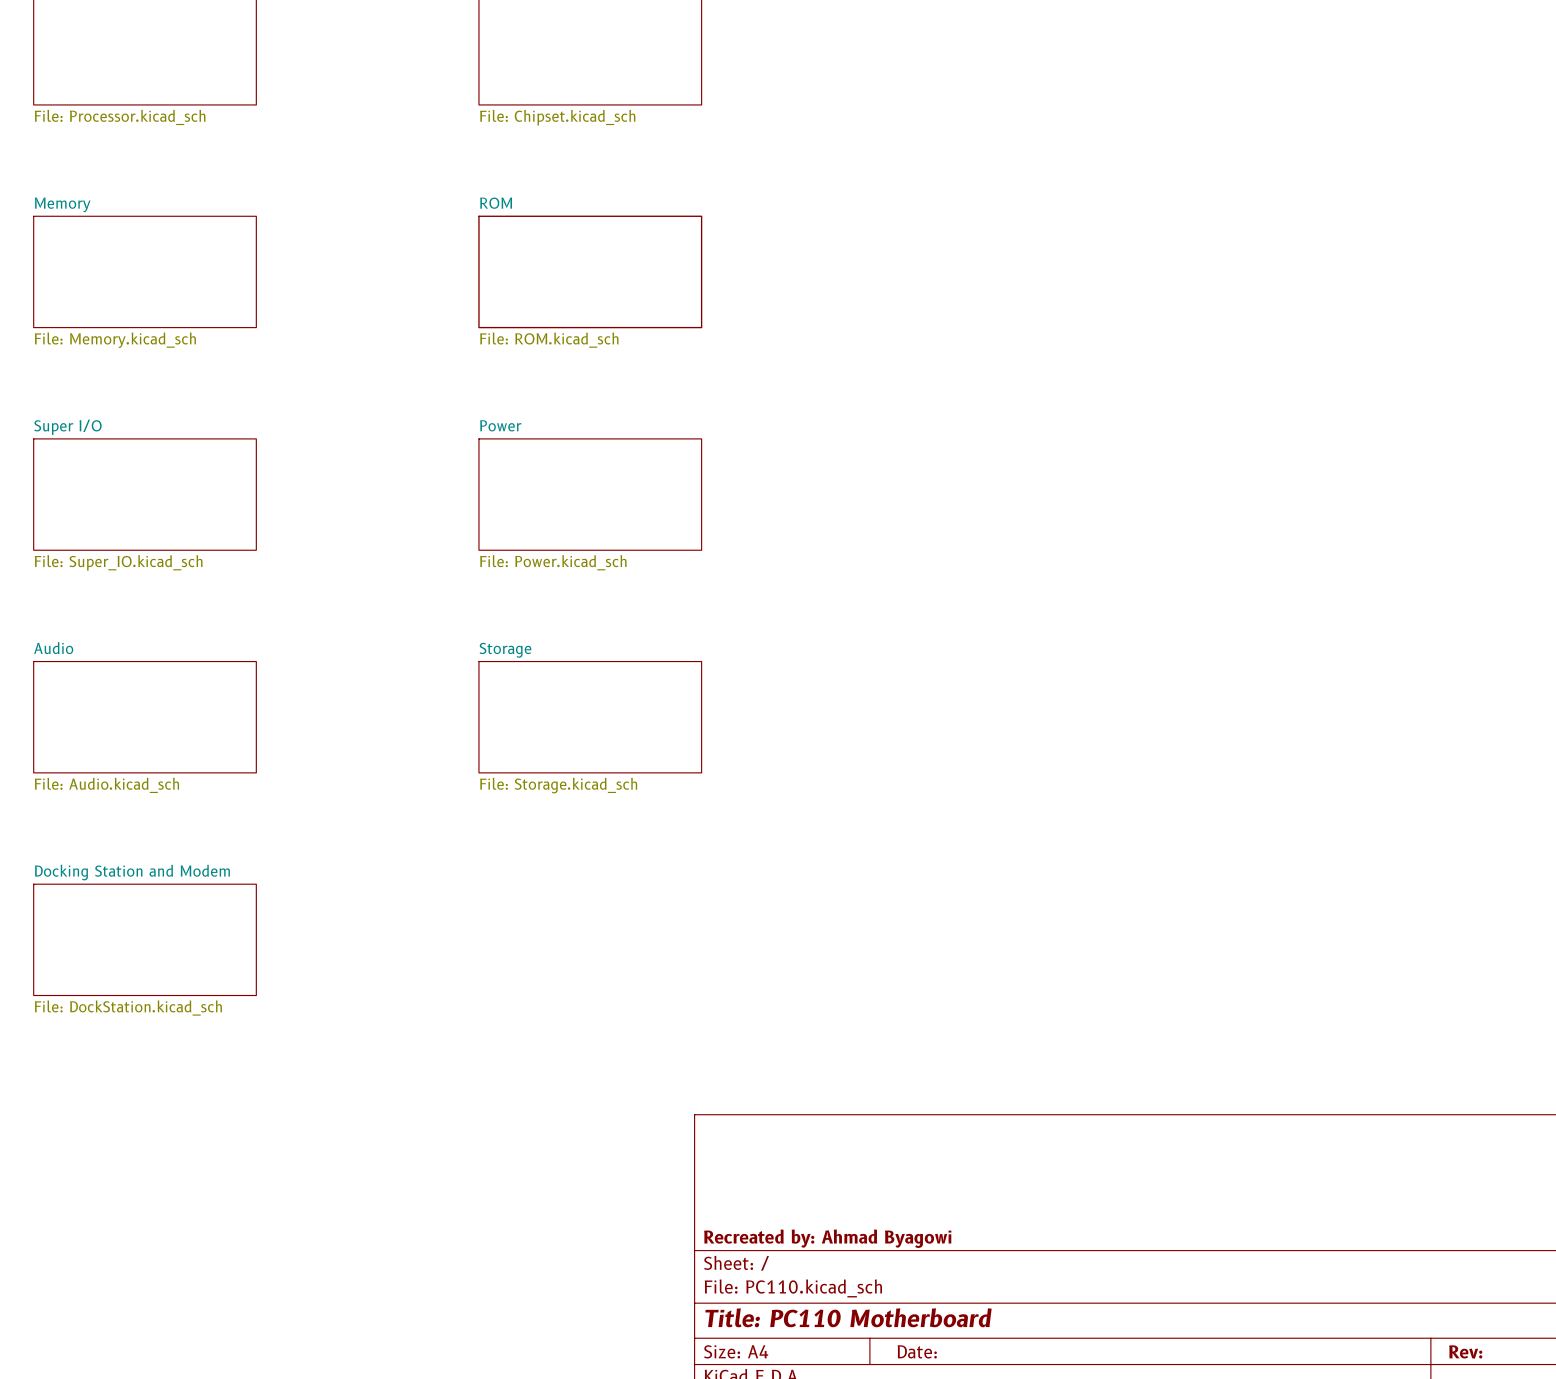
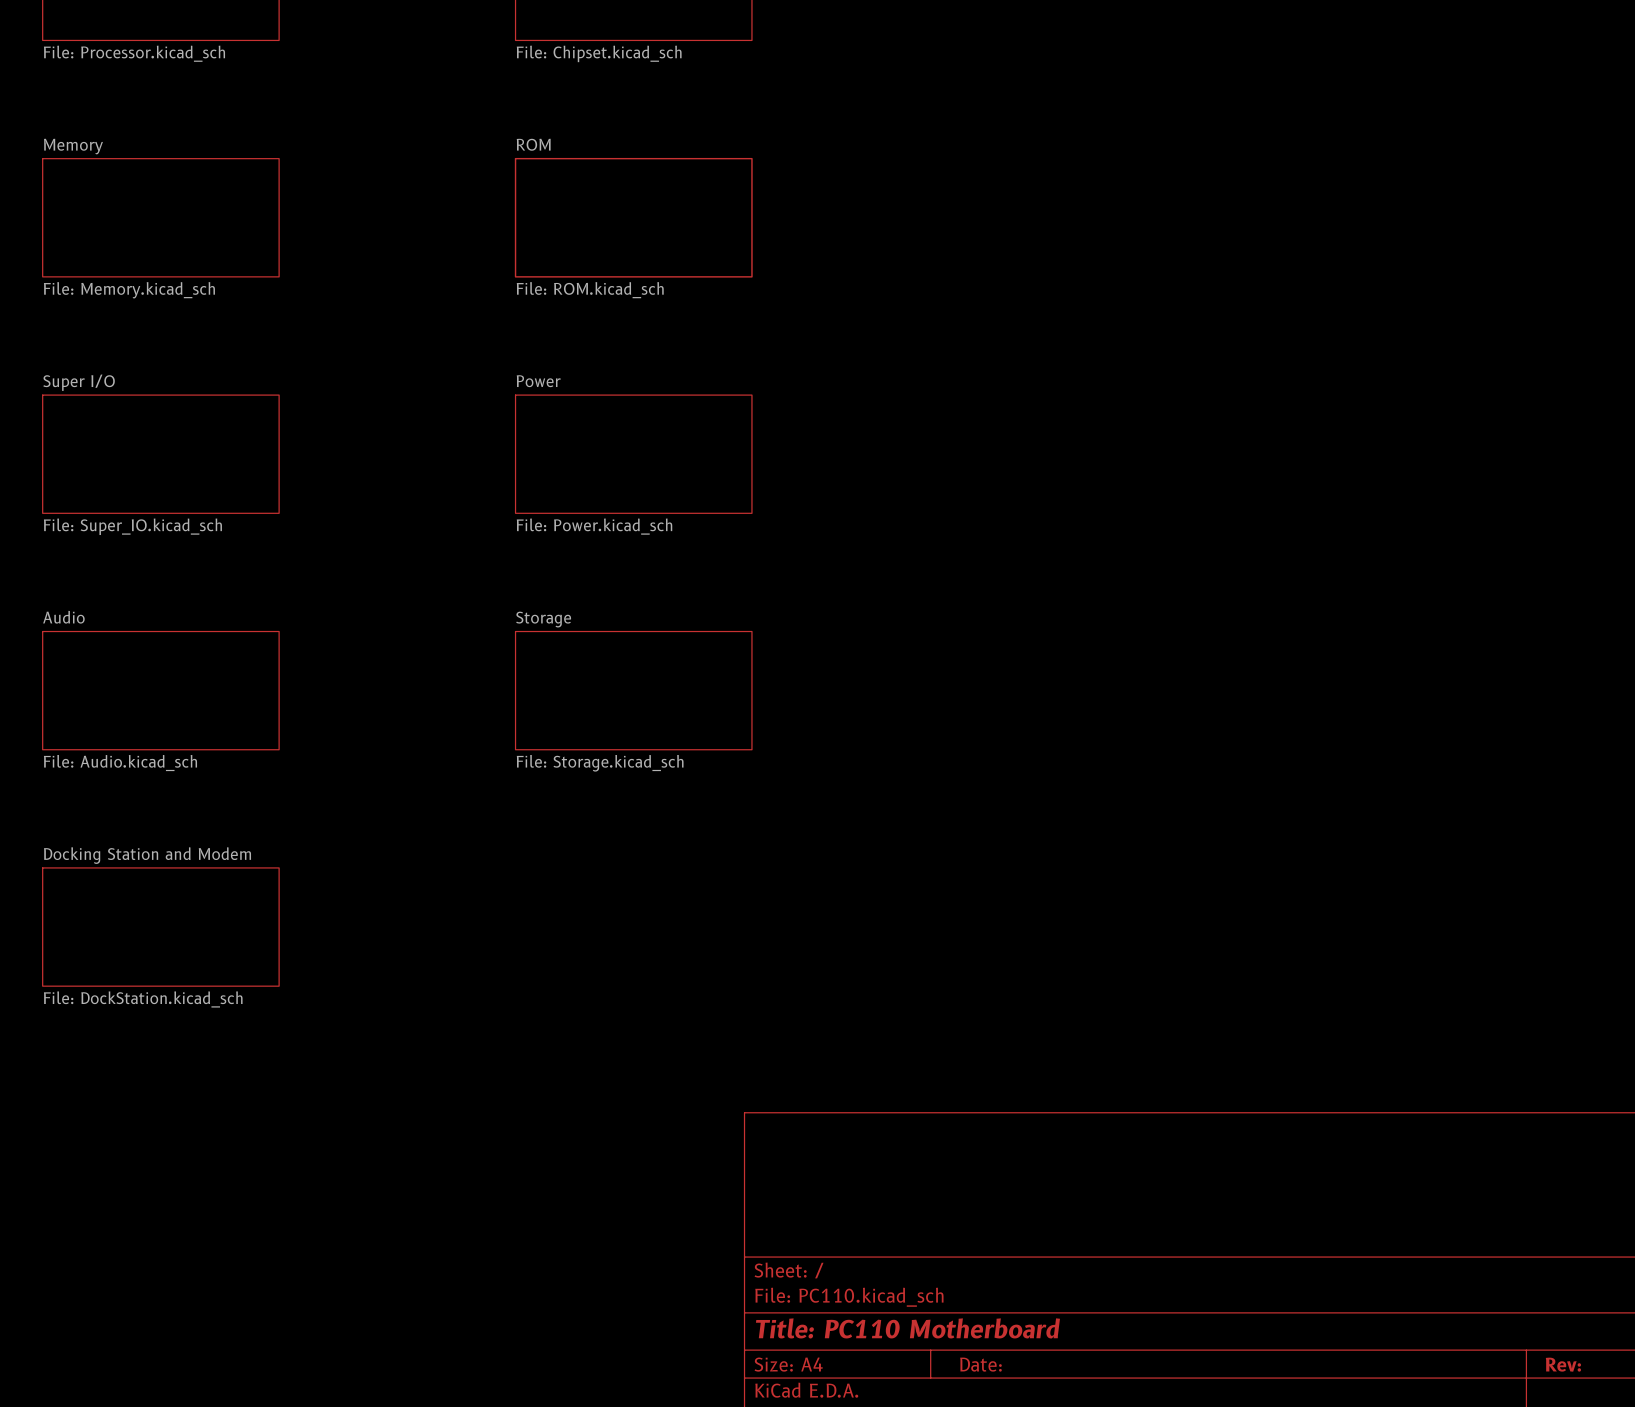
title block: Recreated by: Ahmad Byagowi (827, 1238) -> none

